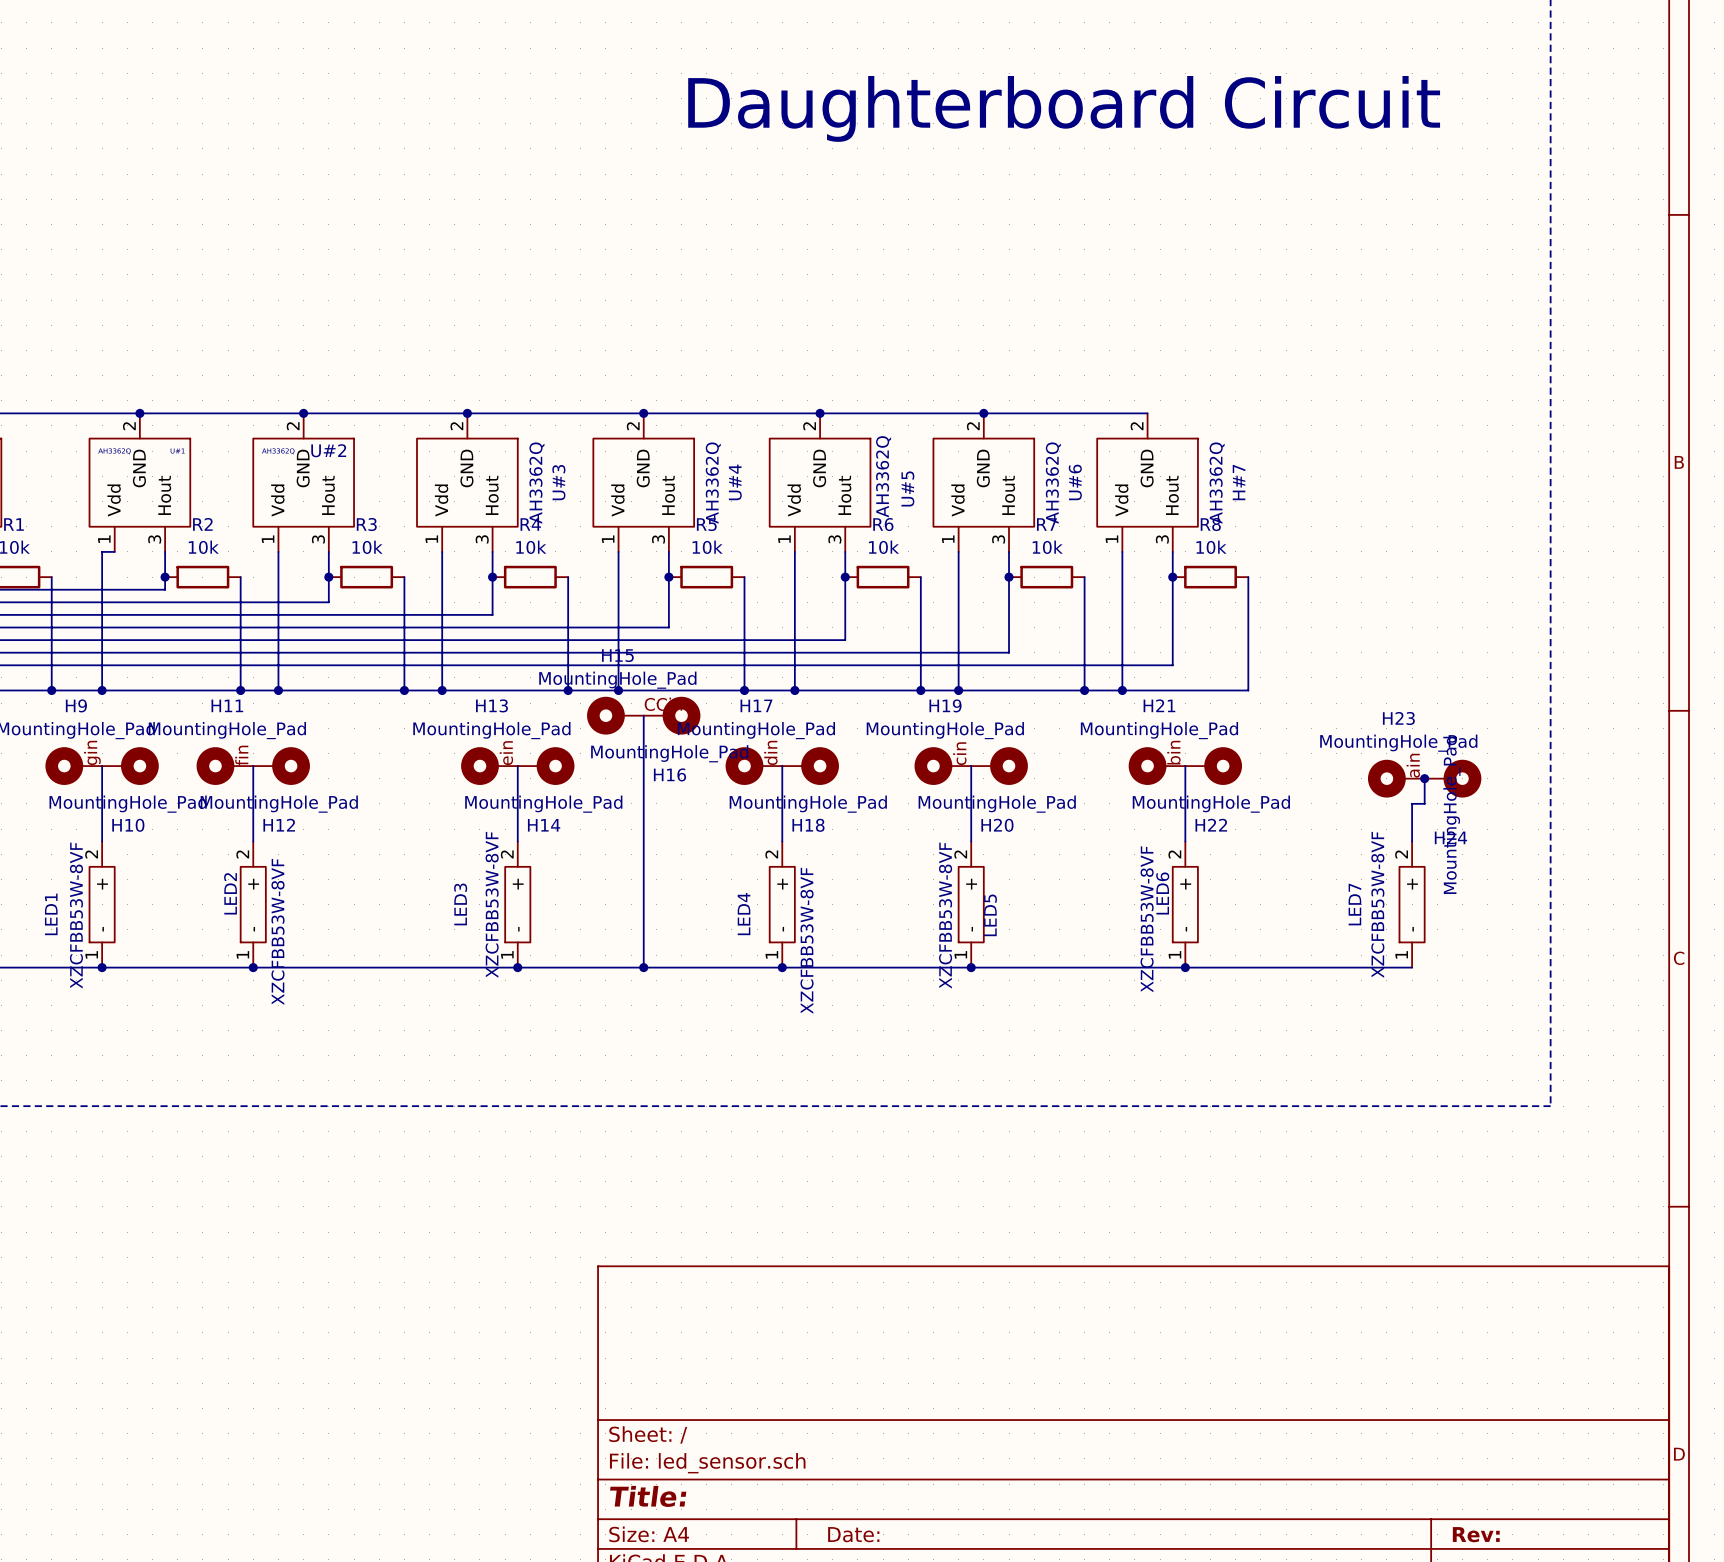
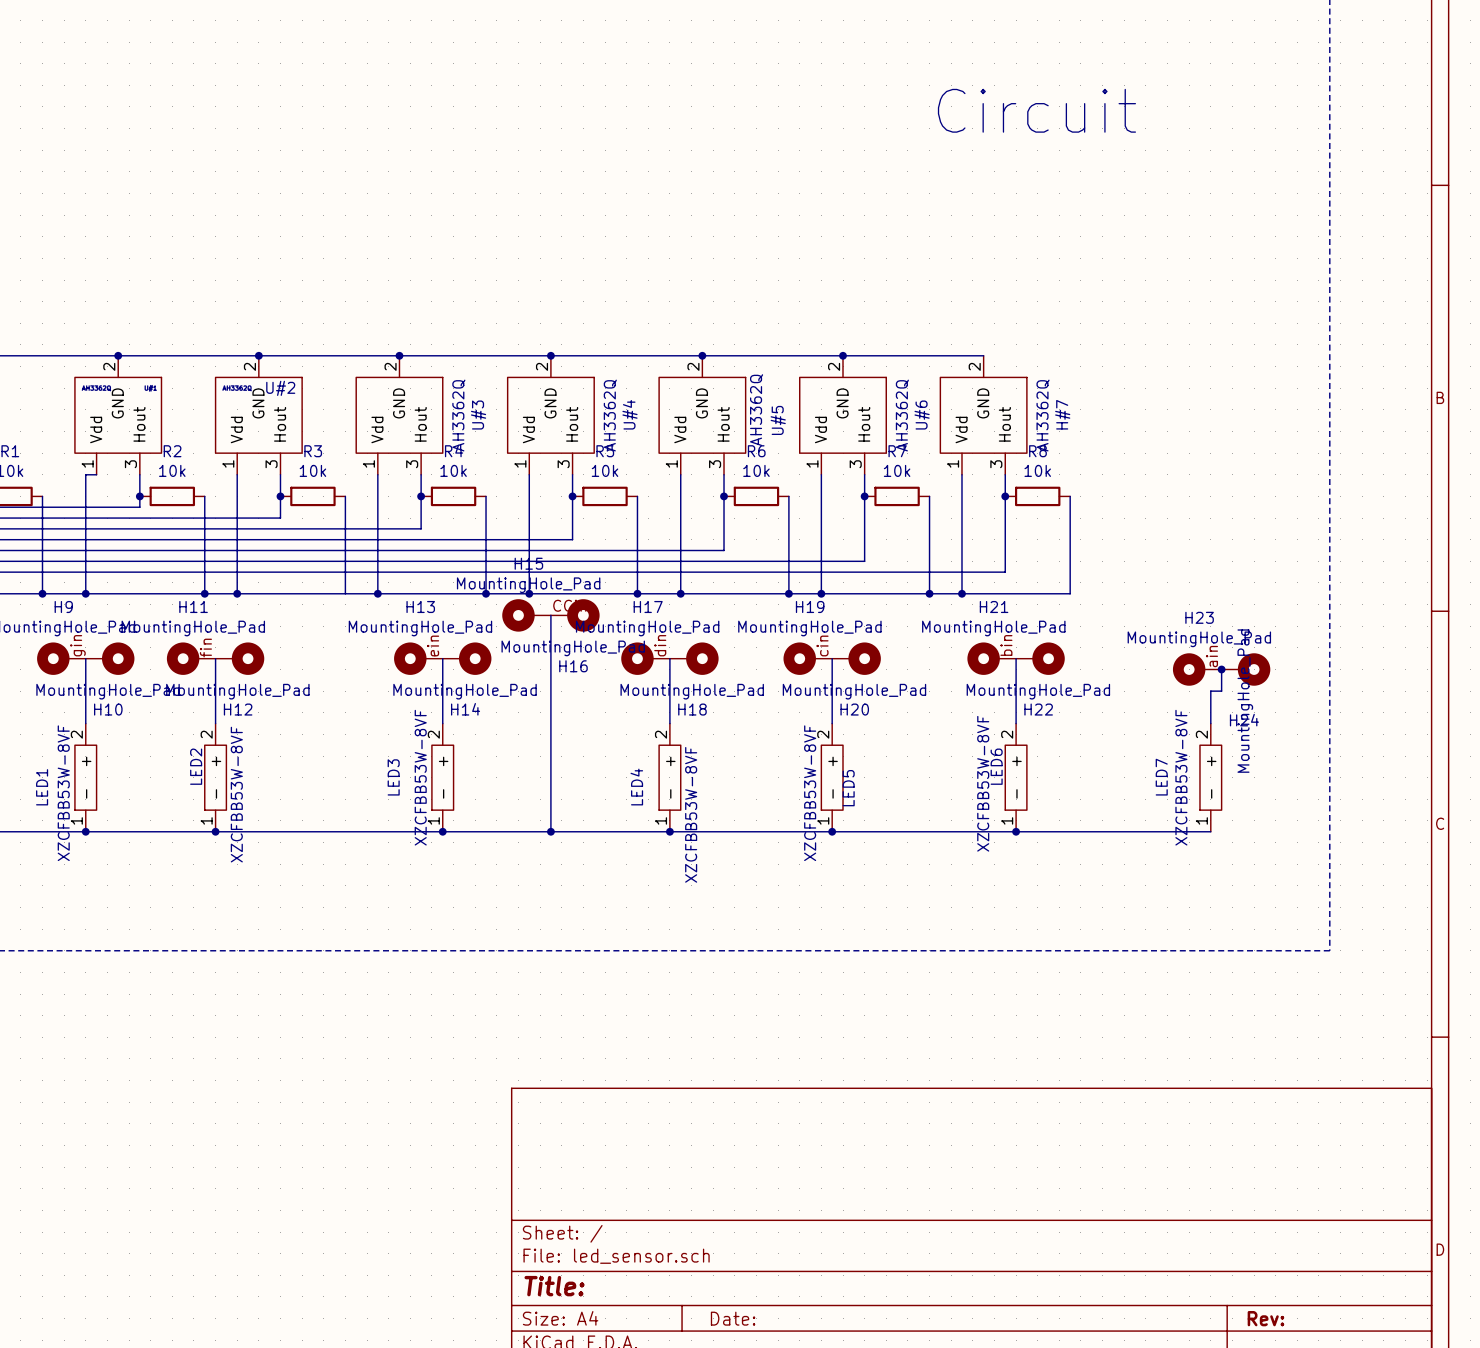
text: Daughterboard Circuit (1064, 108) -> none
text: none -> Circuit (1036, 110)
junction: (404, 690) -> none

